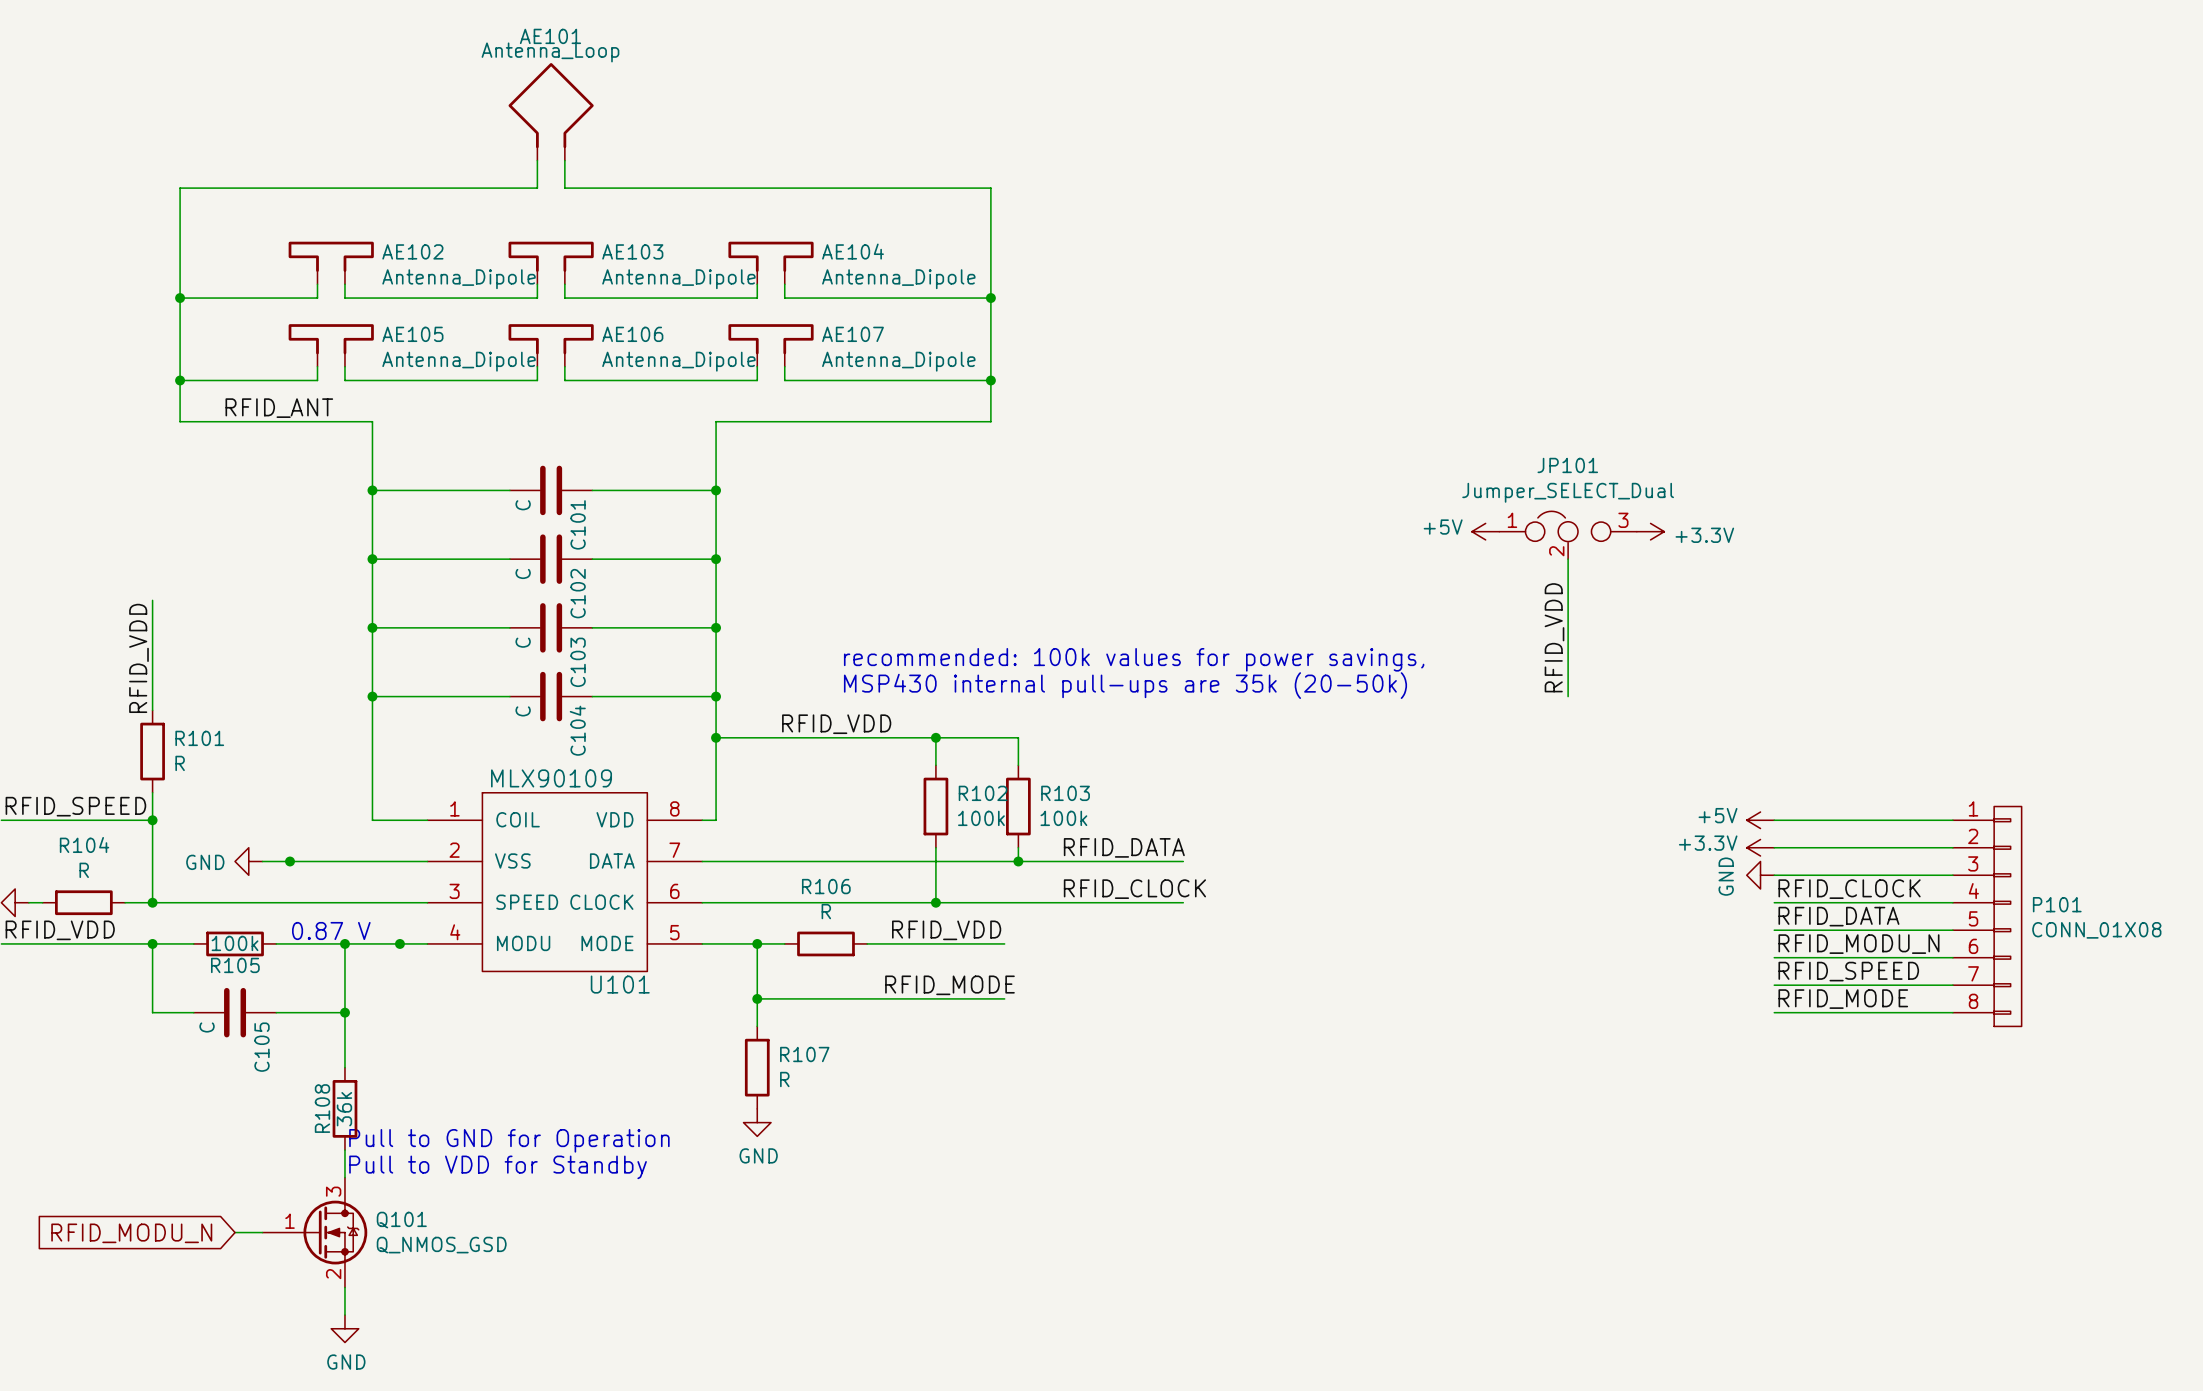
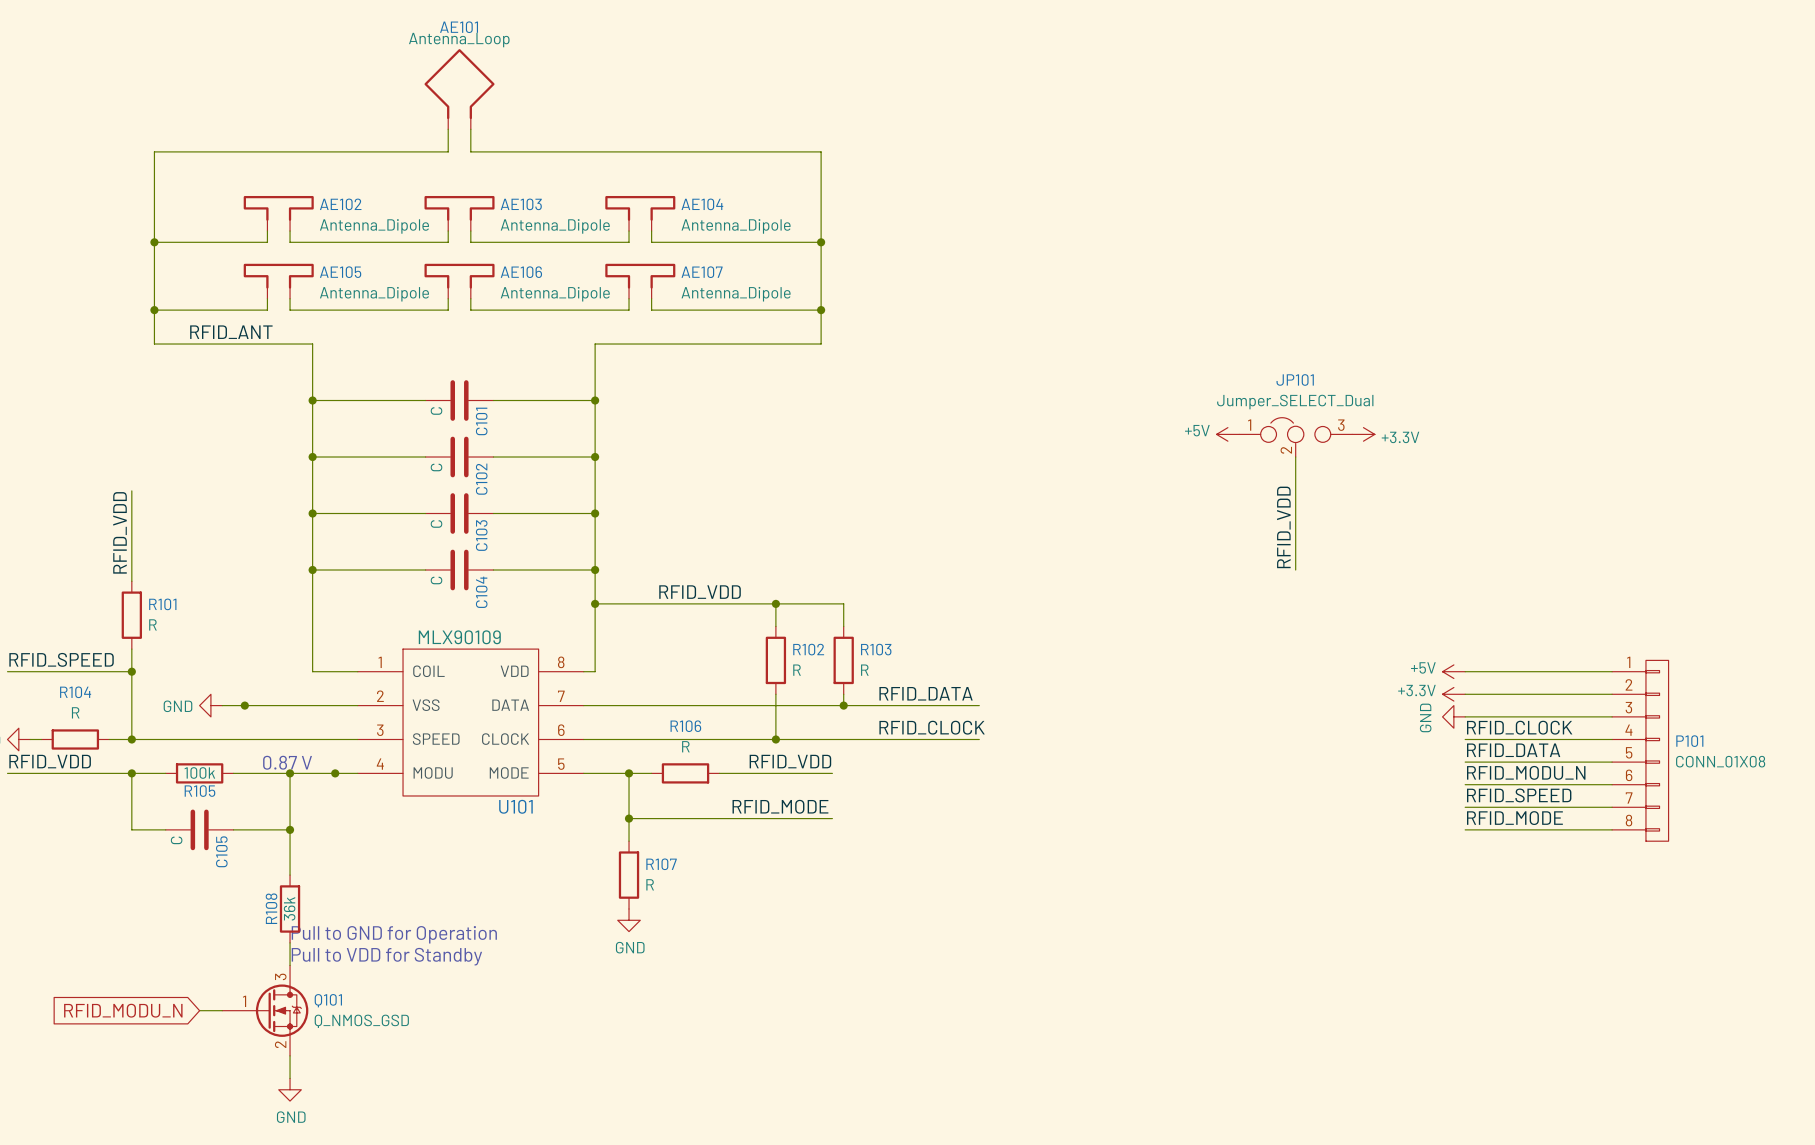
text: recommended: 100k values for power savings, (1134, 659) -> none
text: MSP430 internal pull-ups are 35k (20-50k) (1125, 685) -> none
R102 value: 100k (981, 818) -> R (797, 670)
R103 value: 100k (1063, 818) -> R (864, 670)

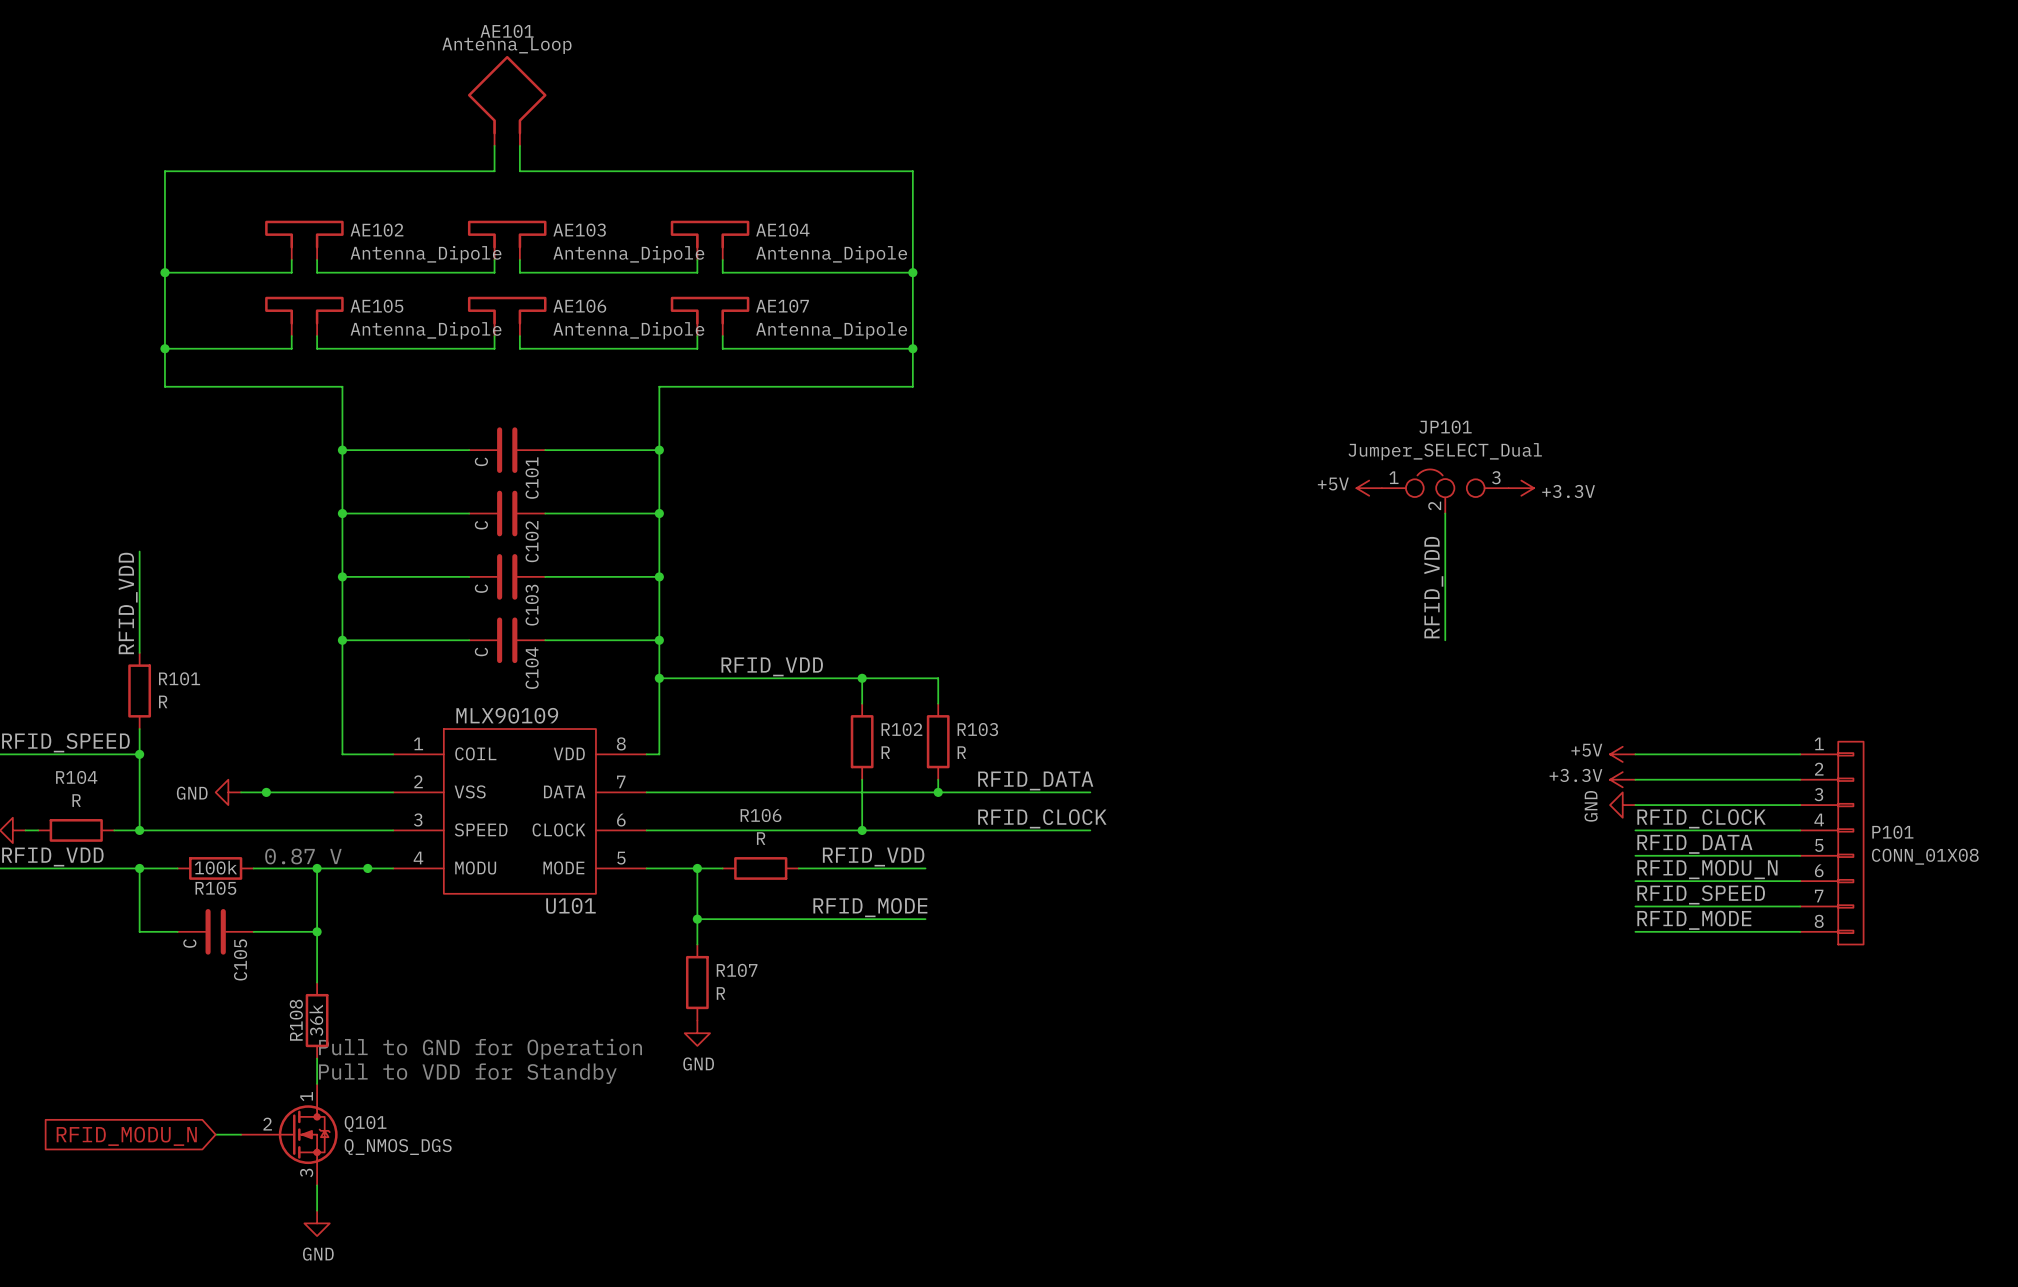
label: RFID_ANT (231, 332) -> none
Q101 symbol: [222, 965, 309, 1056] -> [241, 1083, 338, 1186]
Q101 value: Q_NMOS_GSD (361, 1021) -> Q_NMOS_DGS (398, 1147)

